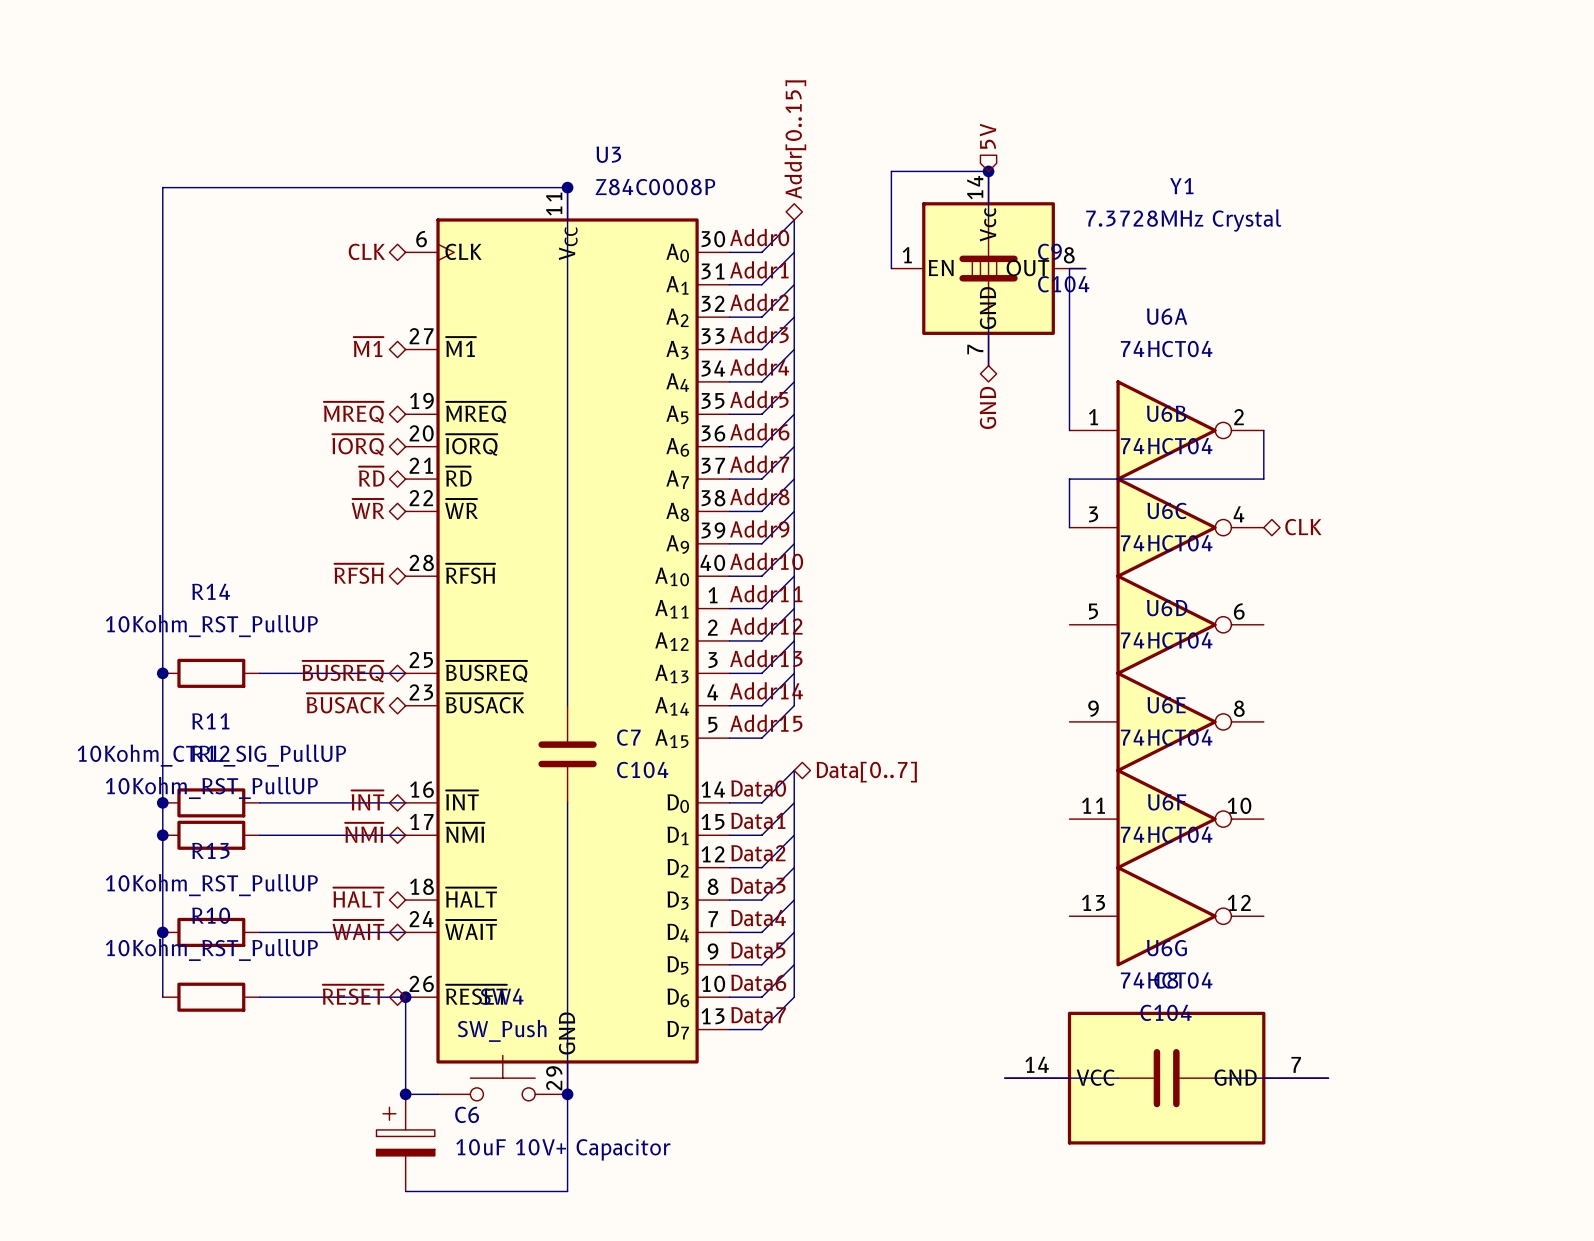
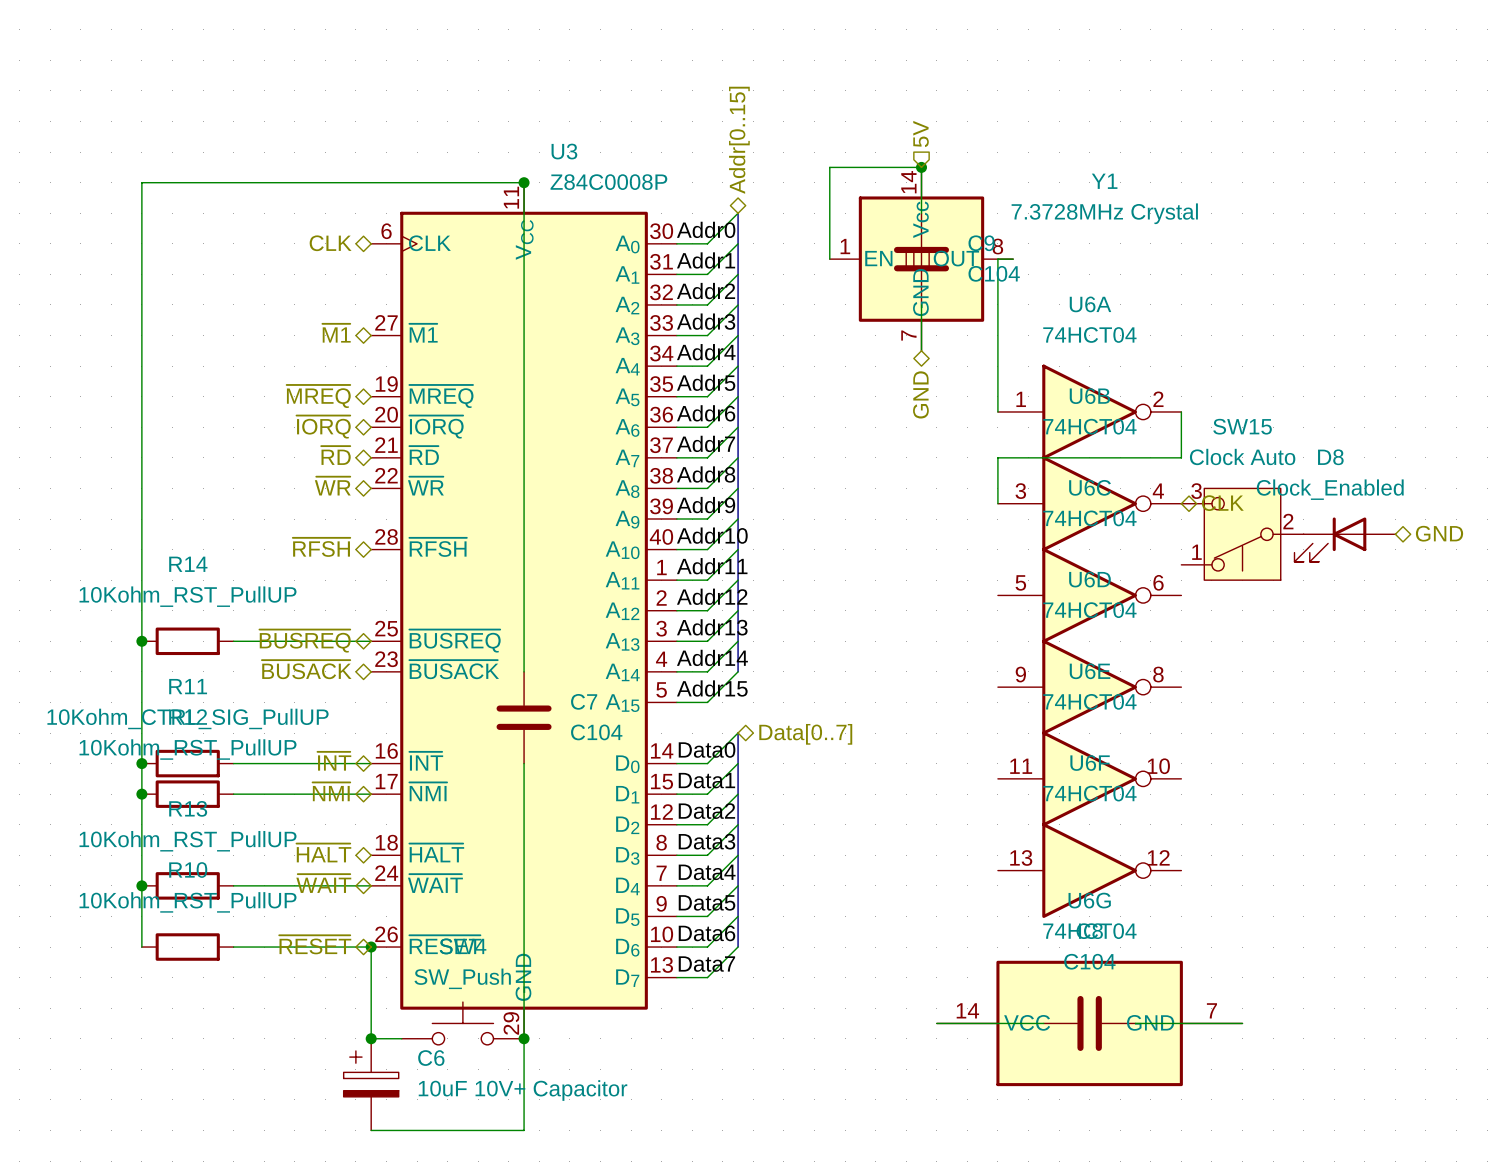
hierarchical label: none -> GND (1439, 533)
SW15: none -> Clock Auto (1242, 534)
D8: none -> Clock_Enabled (1344, 539)

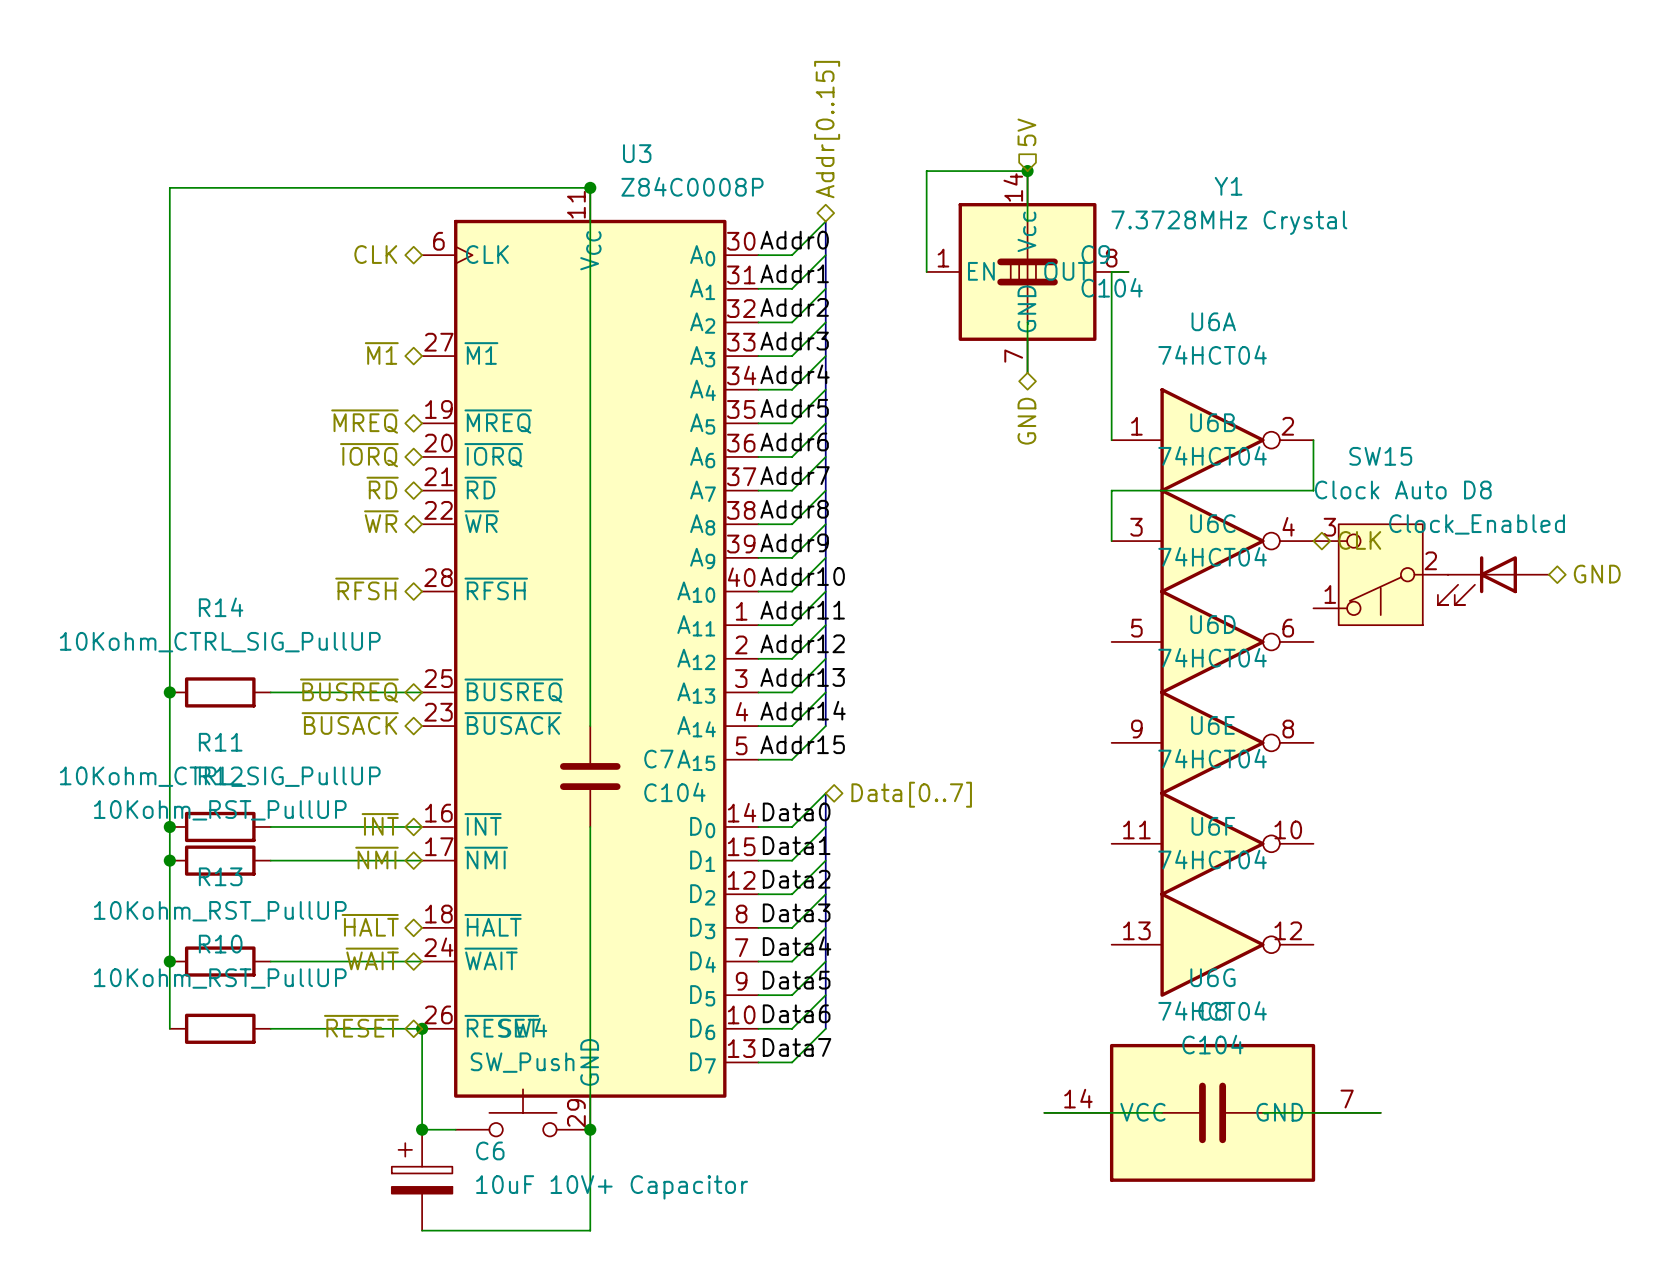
R14 value: 10Kohm_RST_PullUP (188, 596) -> 10Kohm_CTRL_SIG_PullUP (220, 642)

